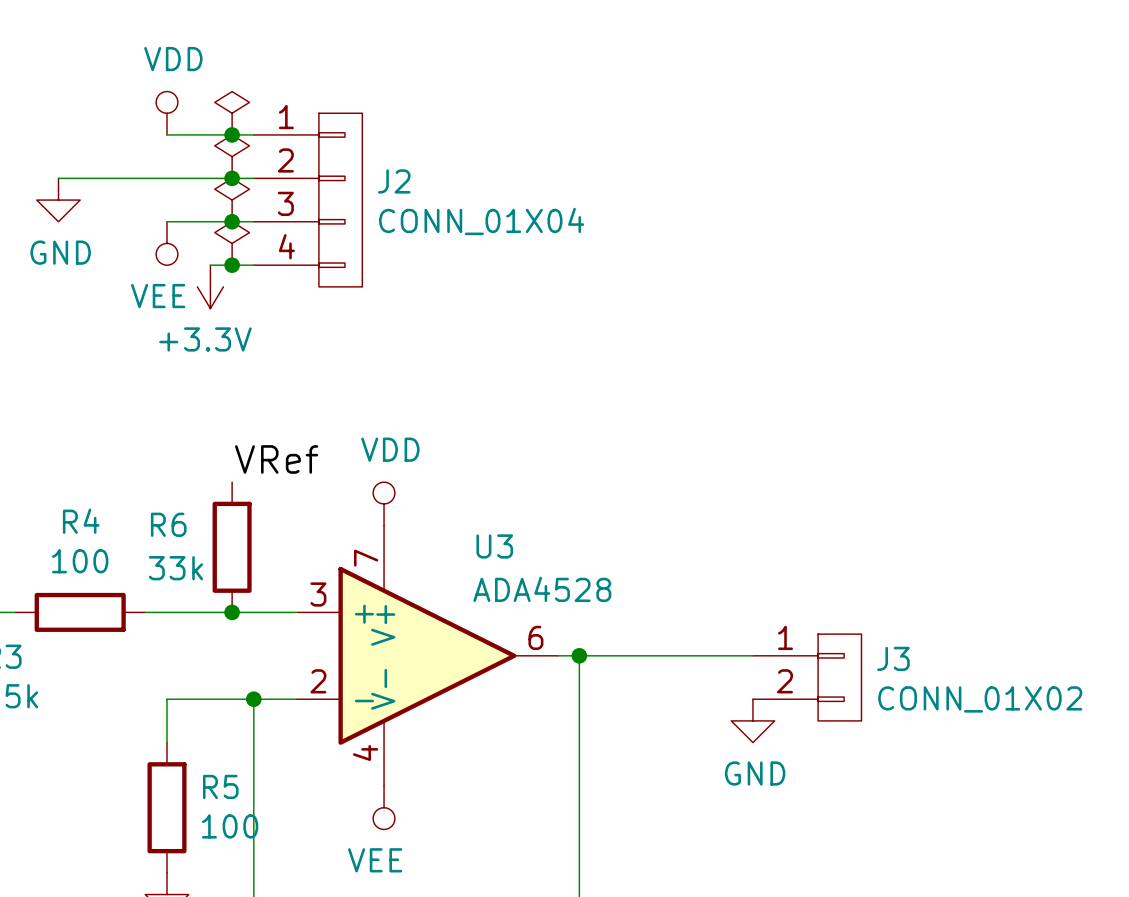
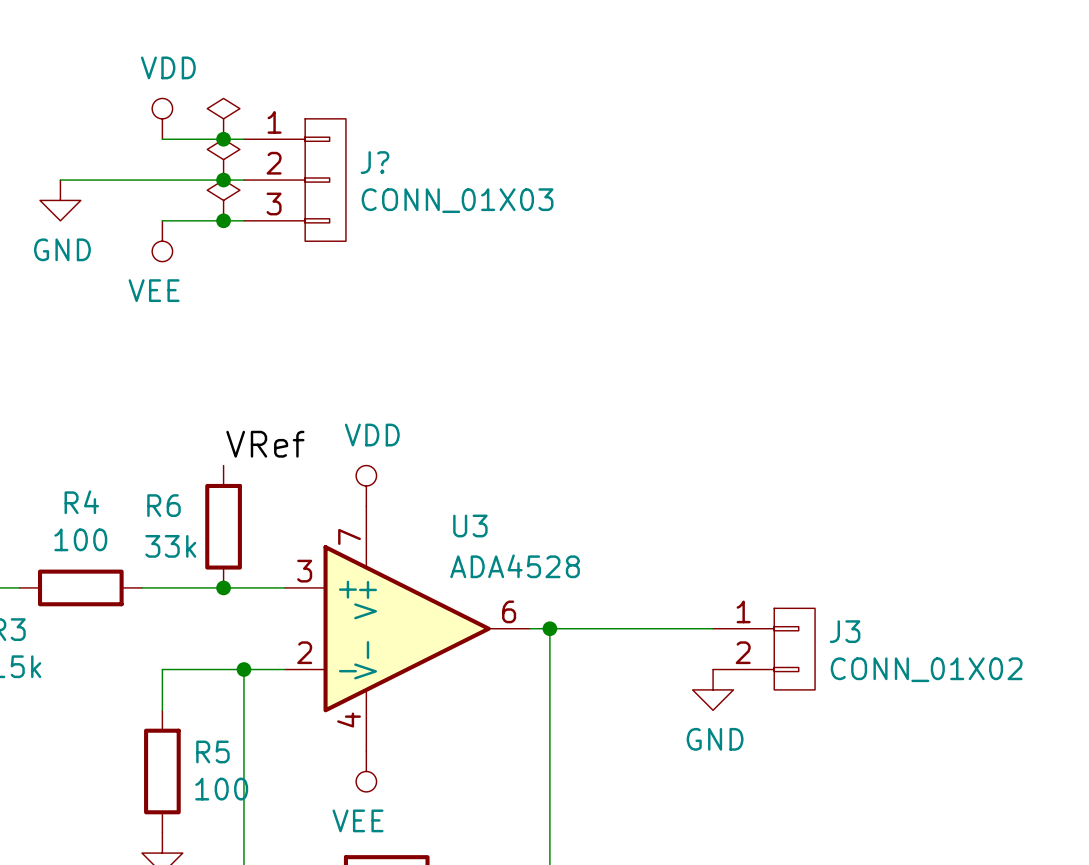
J?: none -> CONN_01X03 (294, 180)
J2: CONN_01X04 (308, 200) -> none
power symbol: (232, 243) -> none
wire: (210, 265) (253, 265) -> none
junction: (232, 265) -> none
power symbol: +3.3V (210, 286) -> none

